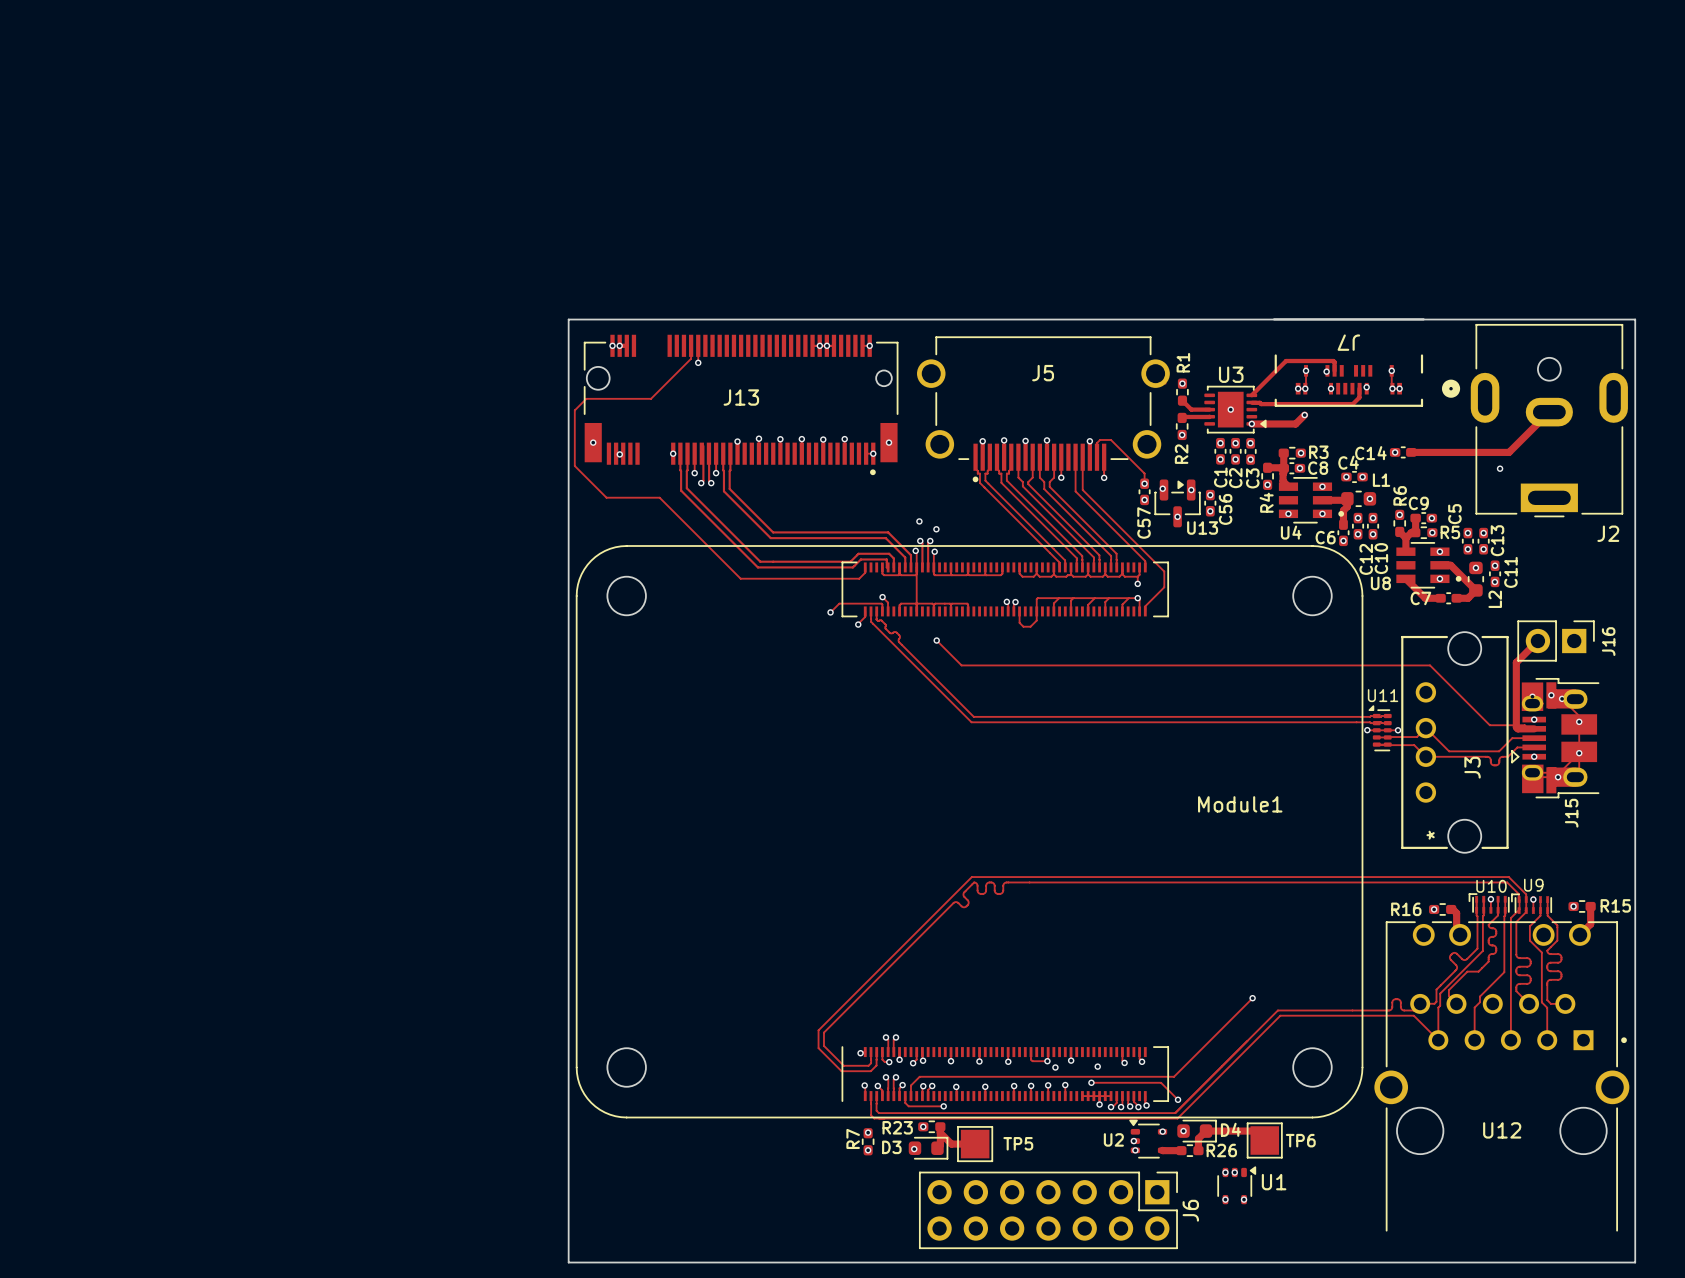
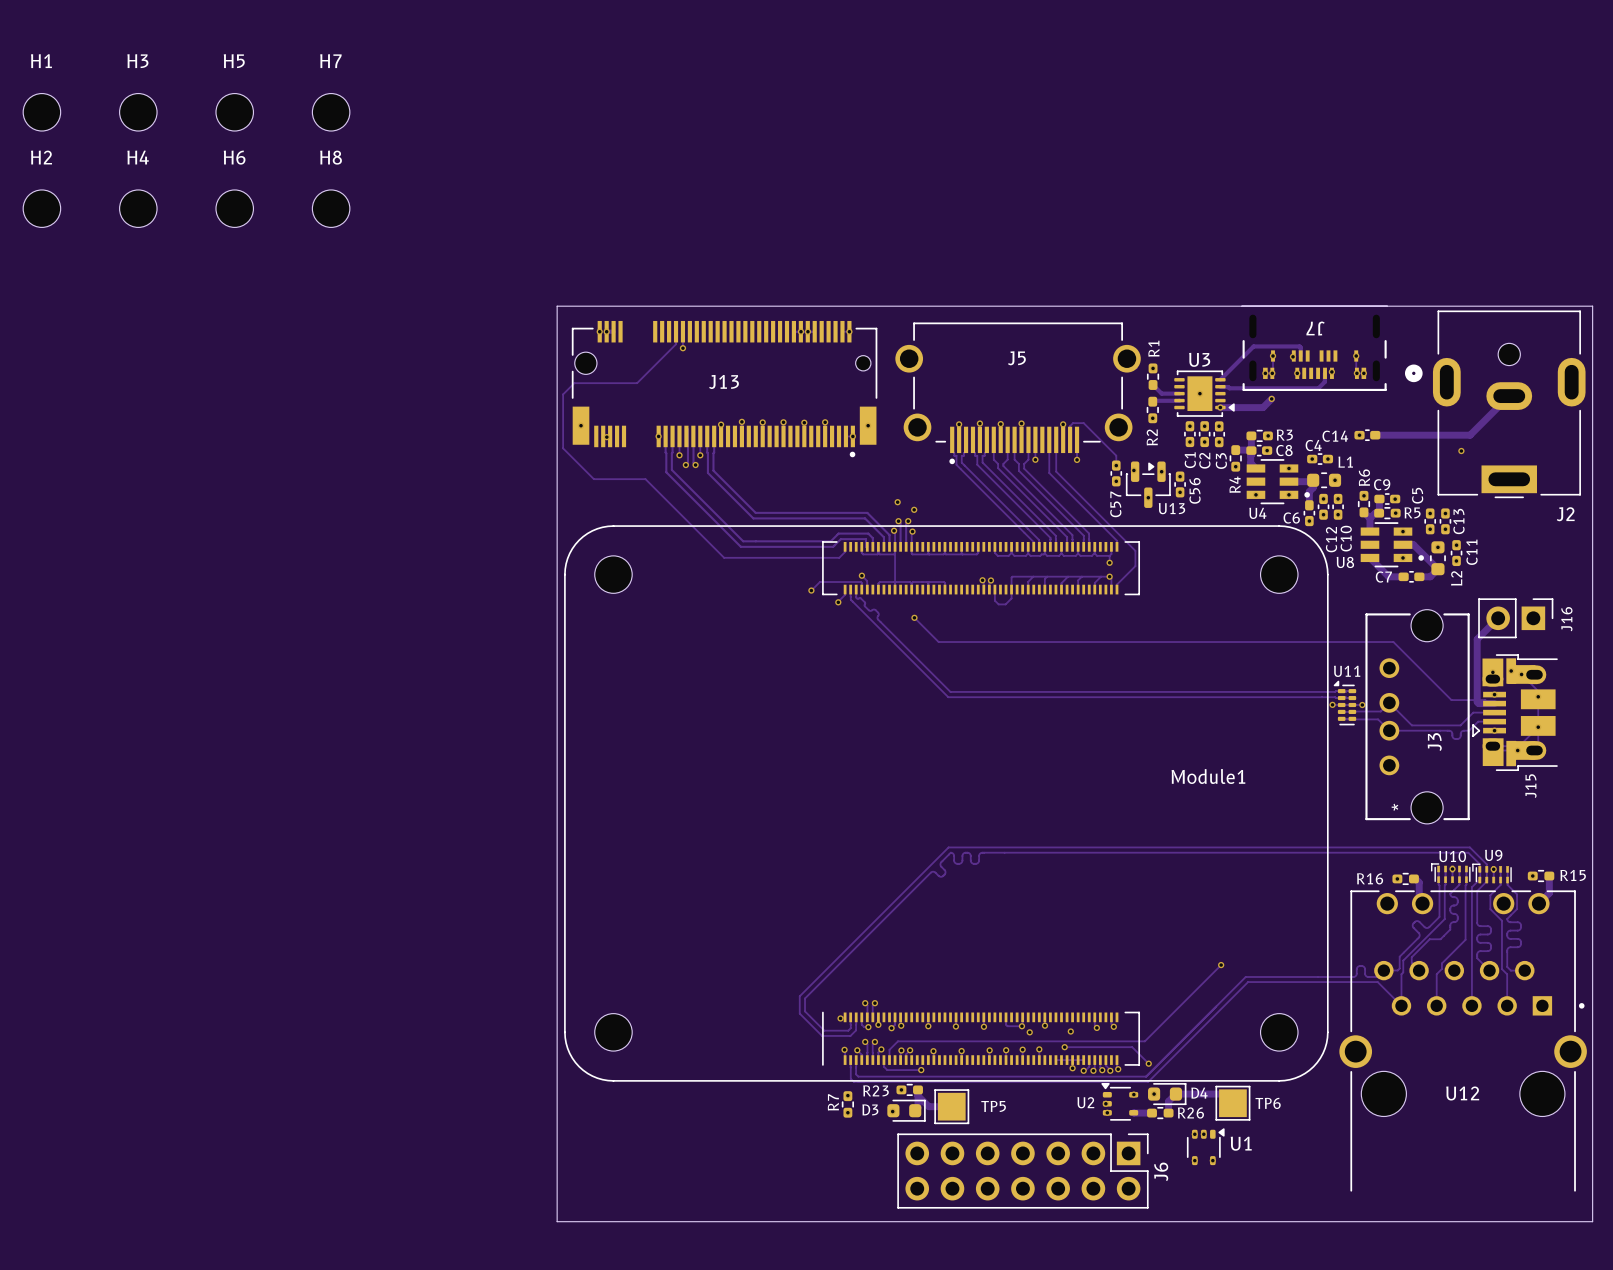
H1: none -> (41, 112)
H3: none -> (138, 112)
H5: none -> (234, 112)
H7: none -> (331, 112)
H2: none -> (41, 208)
H4: none -> (138, 208)
H6: none -> (234, 208)
H8: none -> (331, 208)

